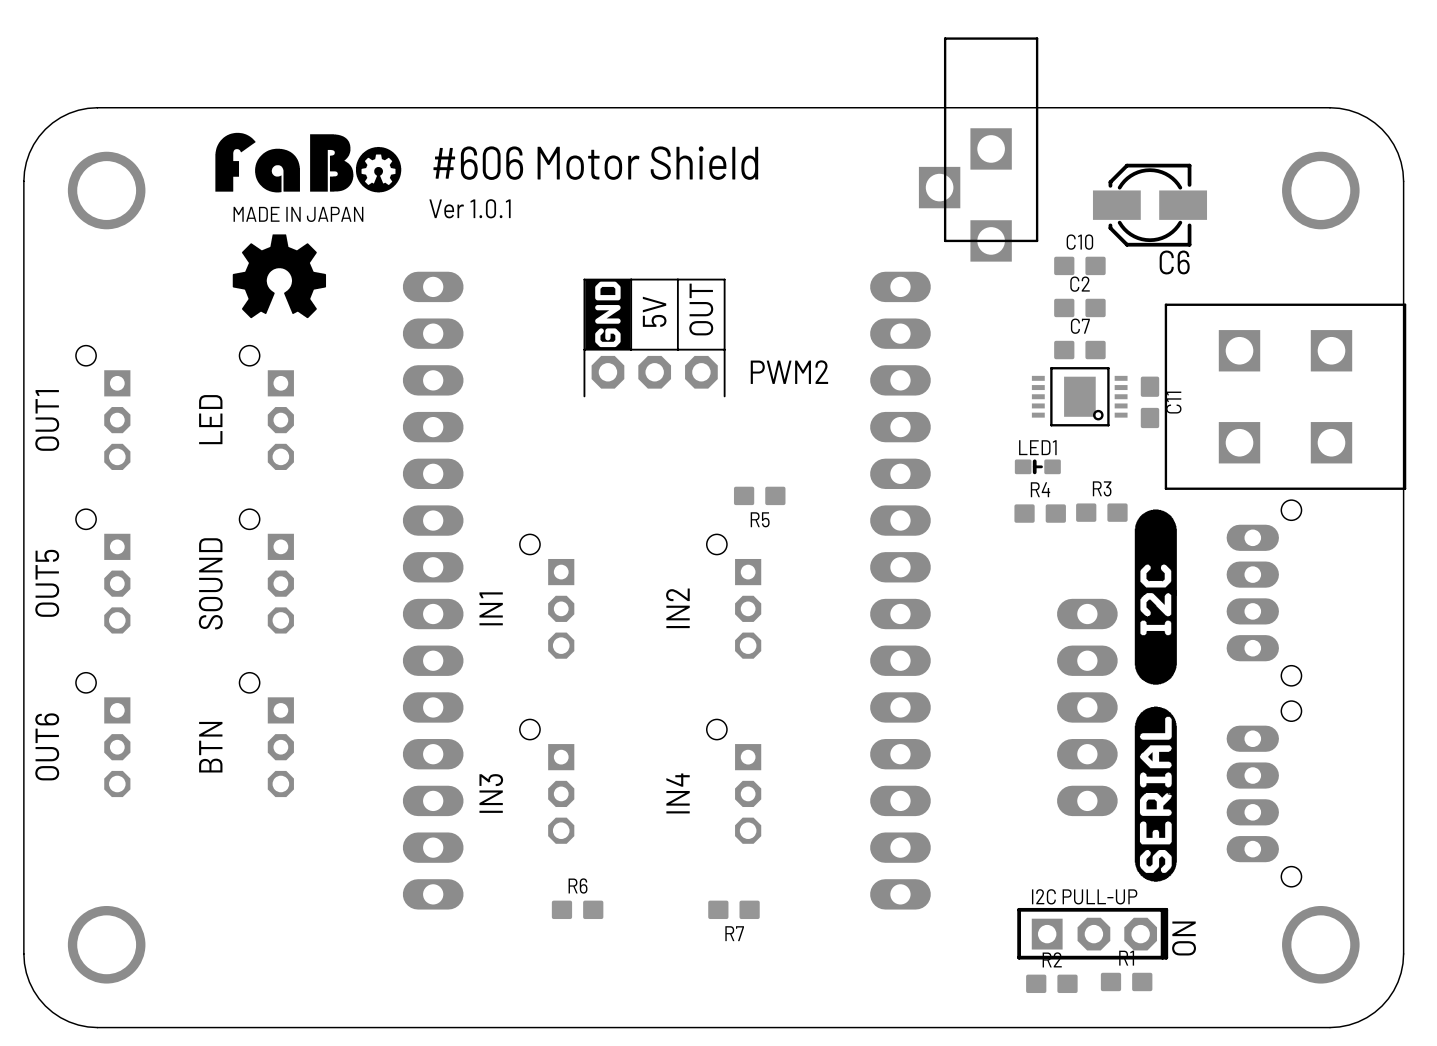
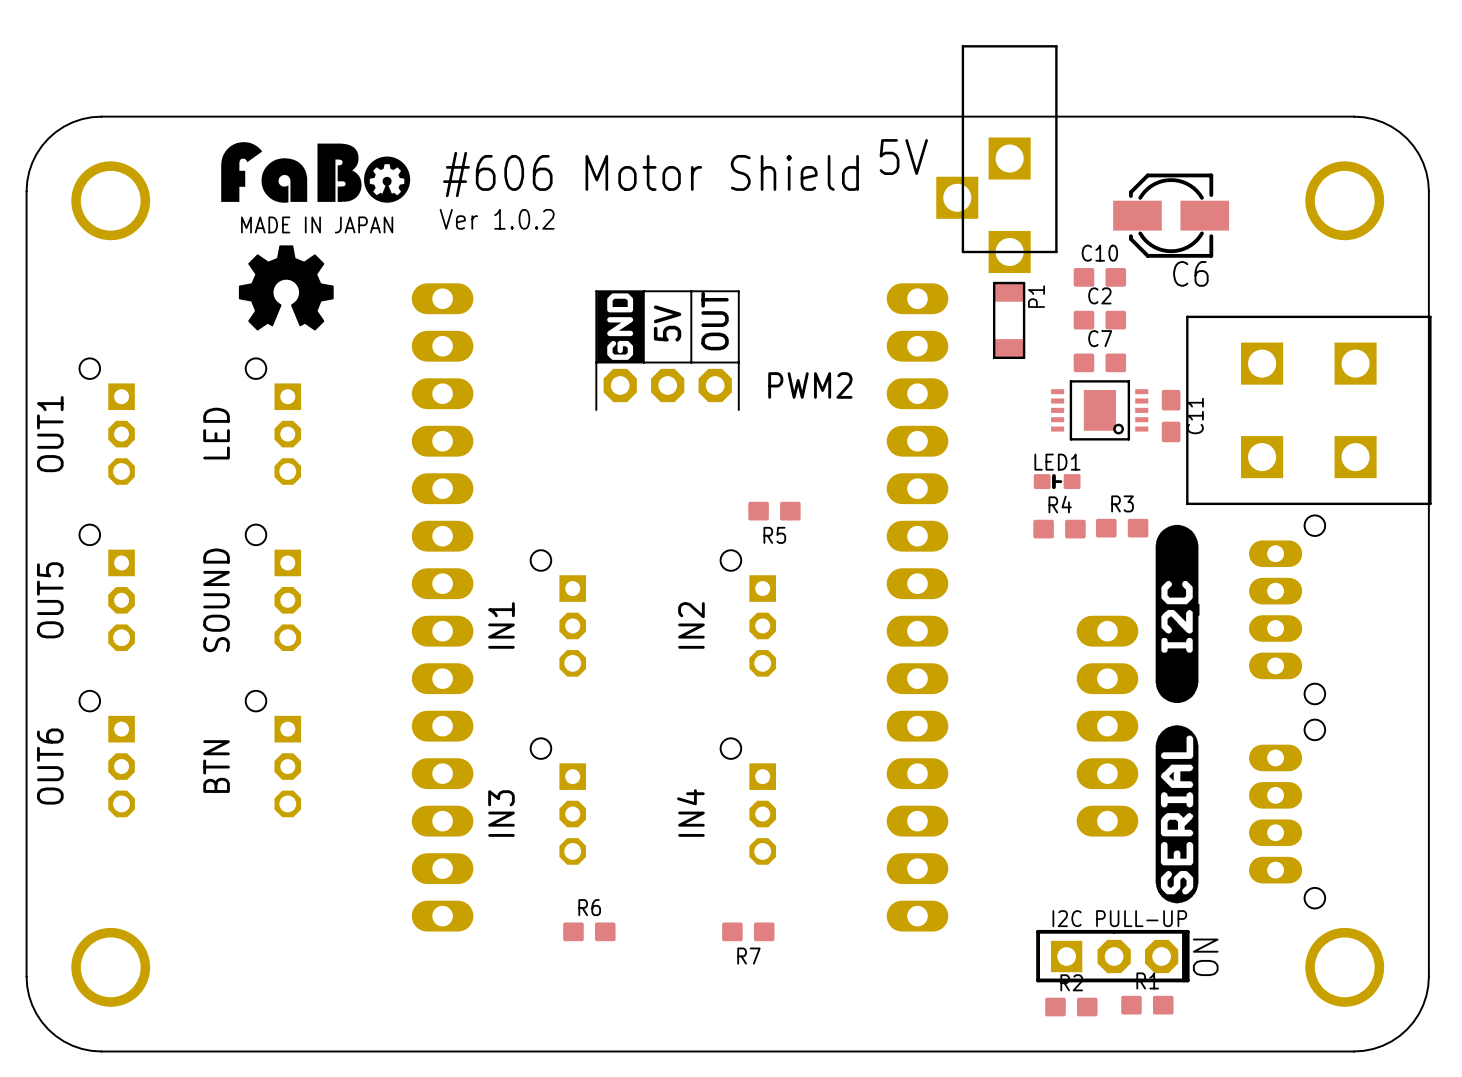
text: none -> 5V (903, 157)
text: Ver 1.0.1 (470, 208) -> Ver 1.0.2 (497, 219)
P1: none -> (1009, 320)

